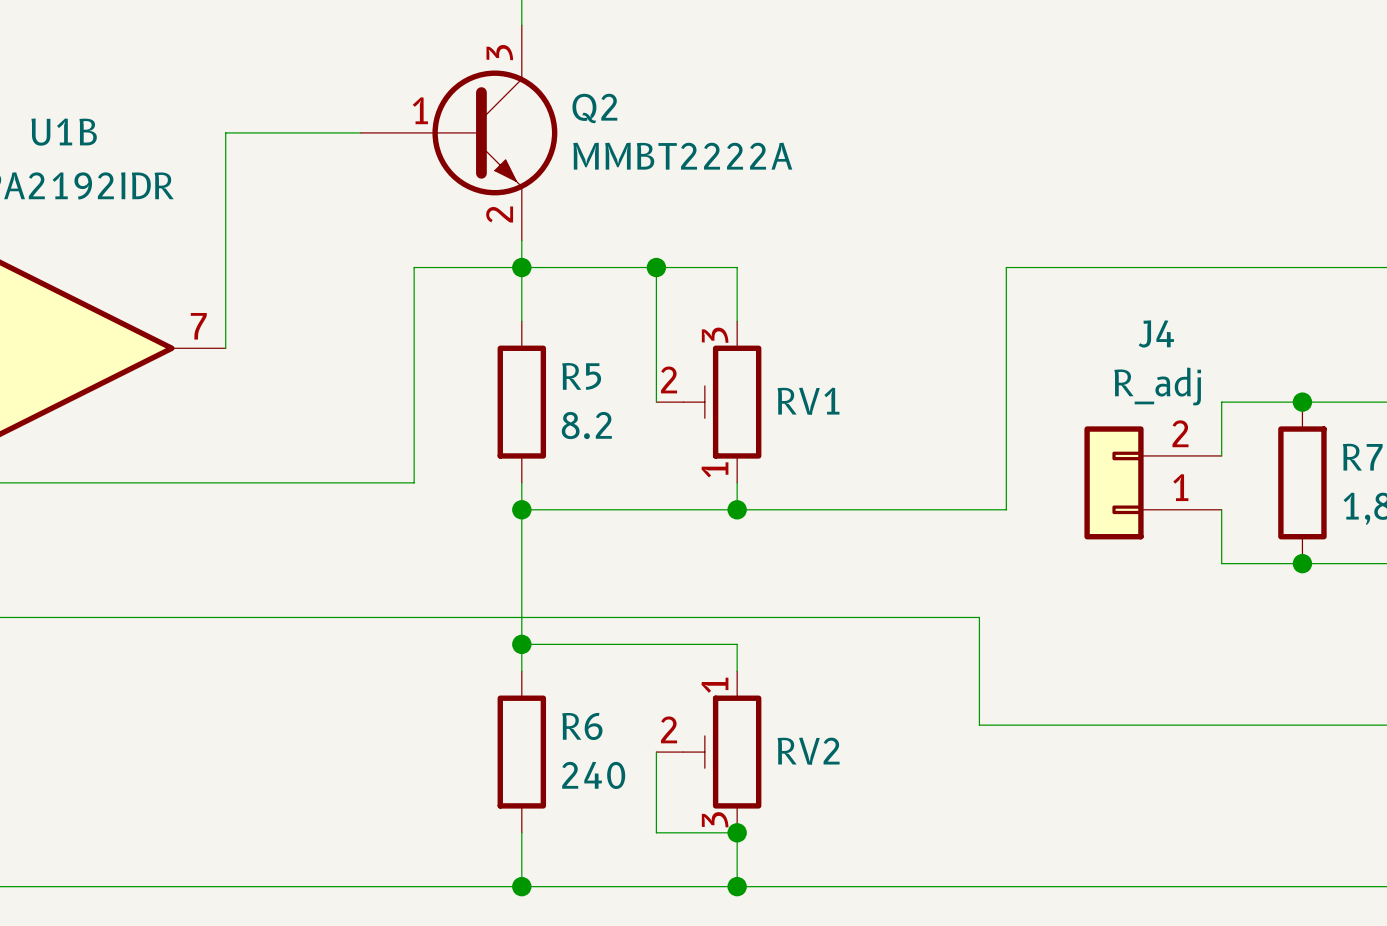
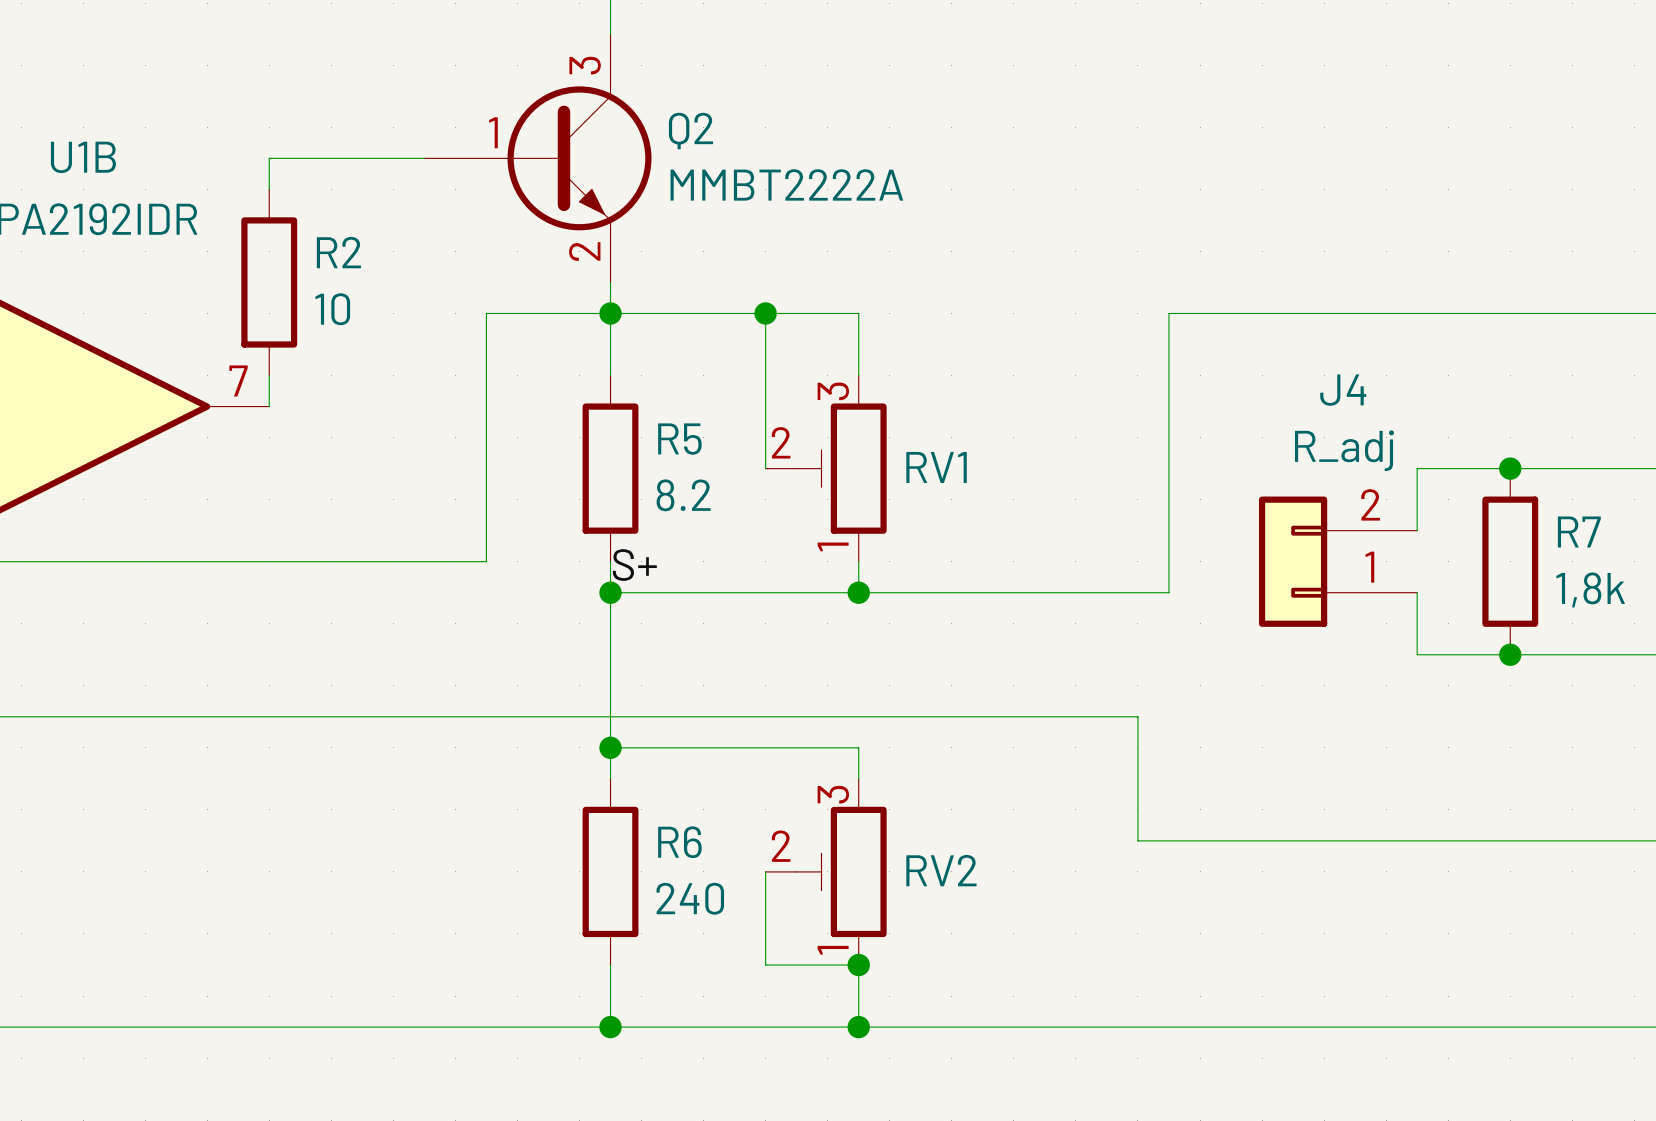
wire: (225, 159) (225, 321) -> none
R2: none -> 10 (269, 282)
label: none -> S+ (634, 565)
RV2 flip: as is (722, 752) -> up-down (841, 871)

